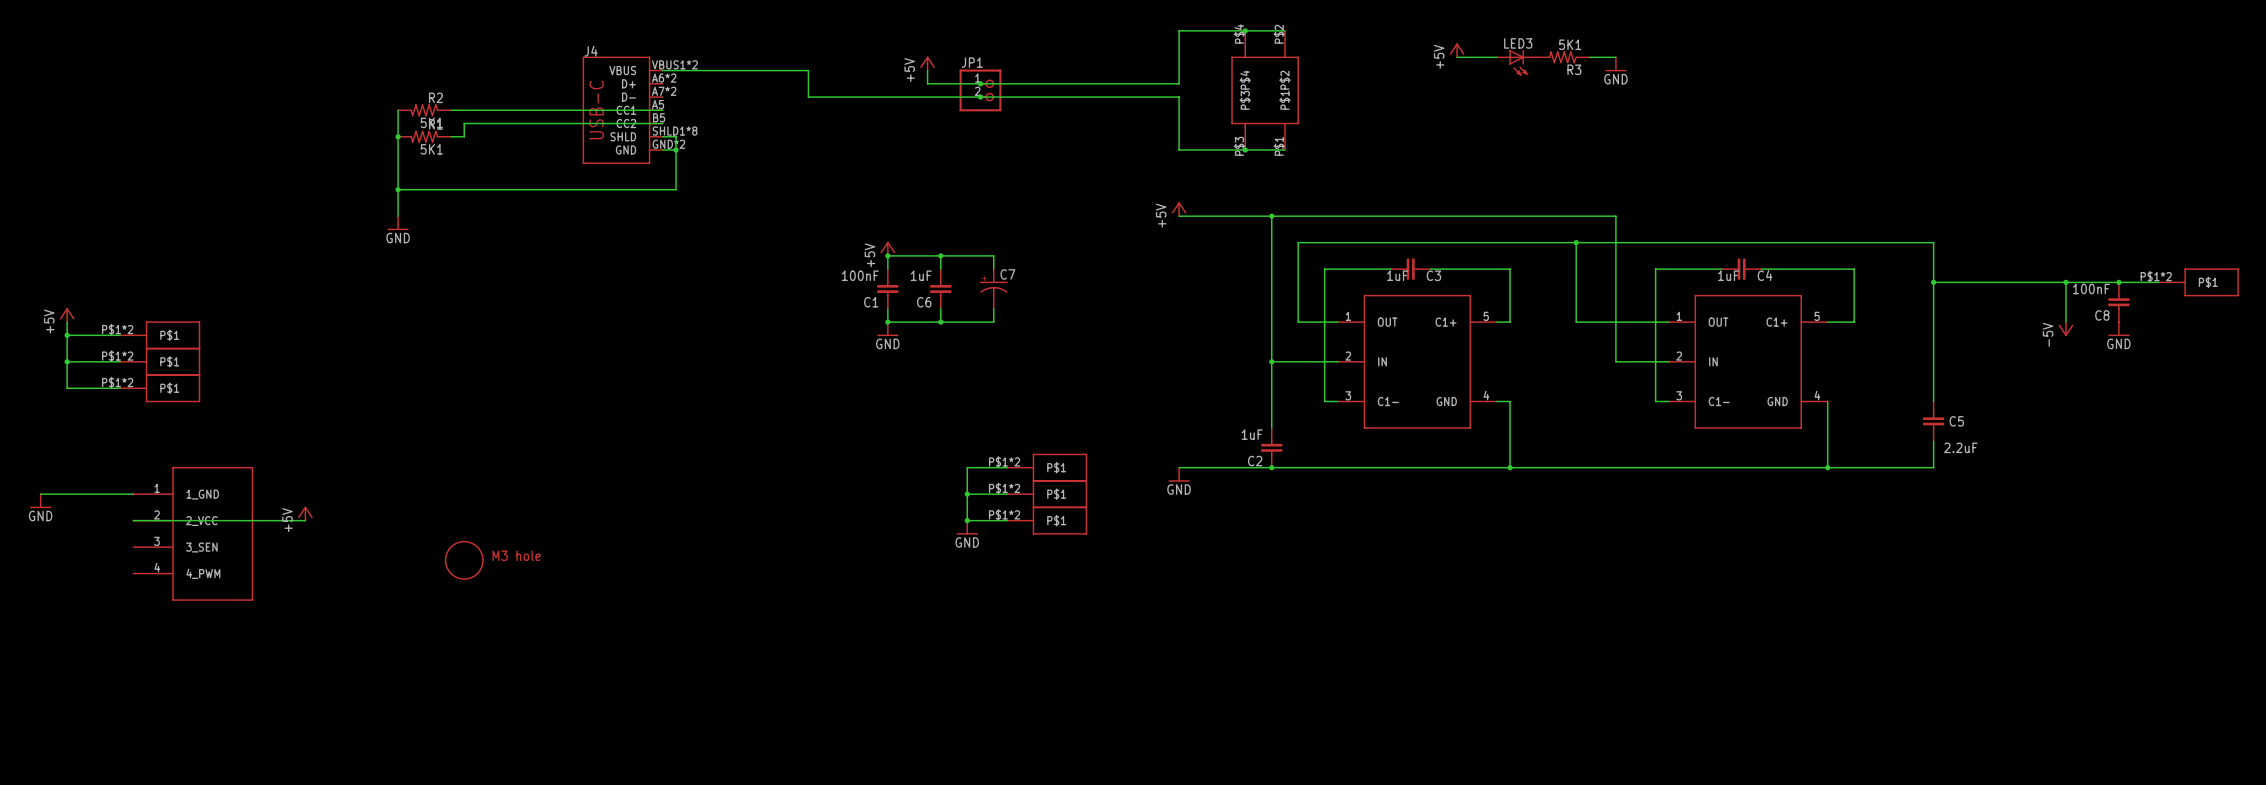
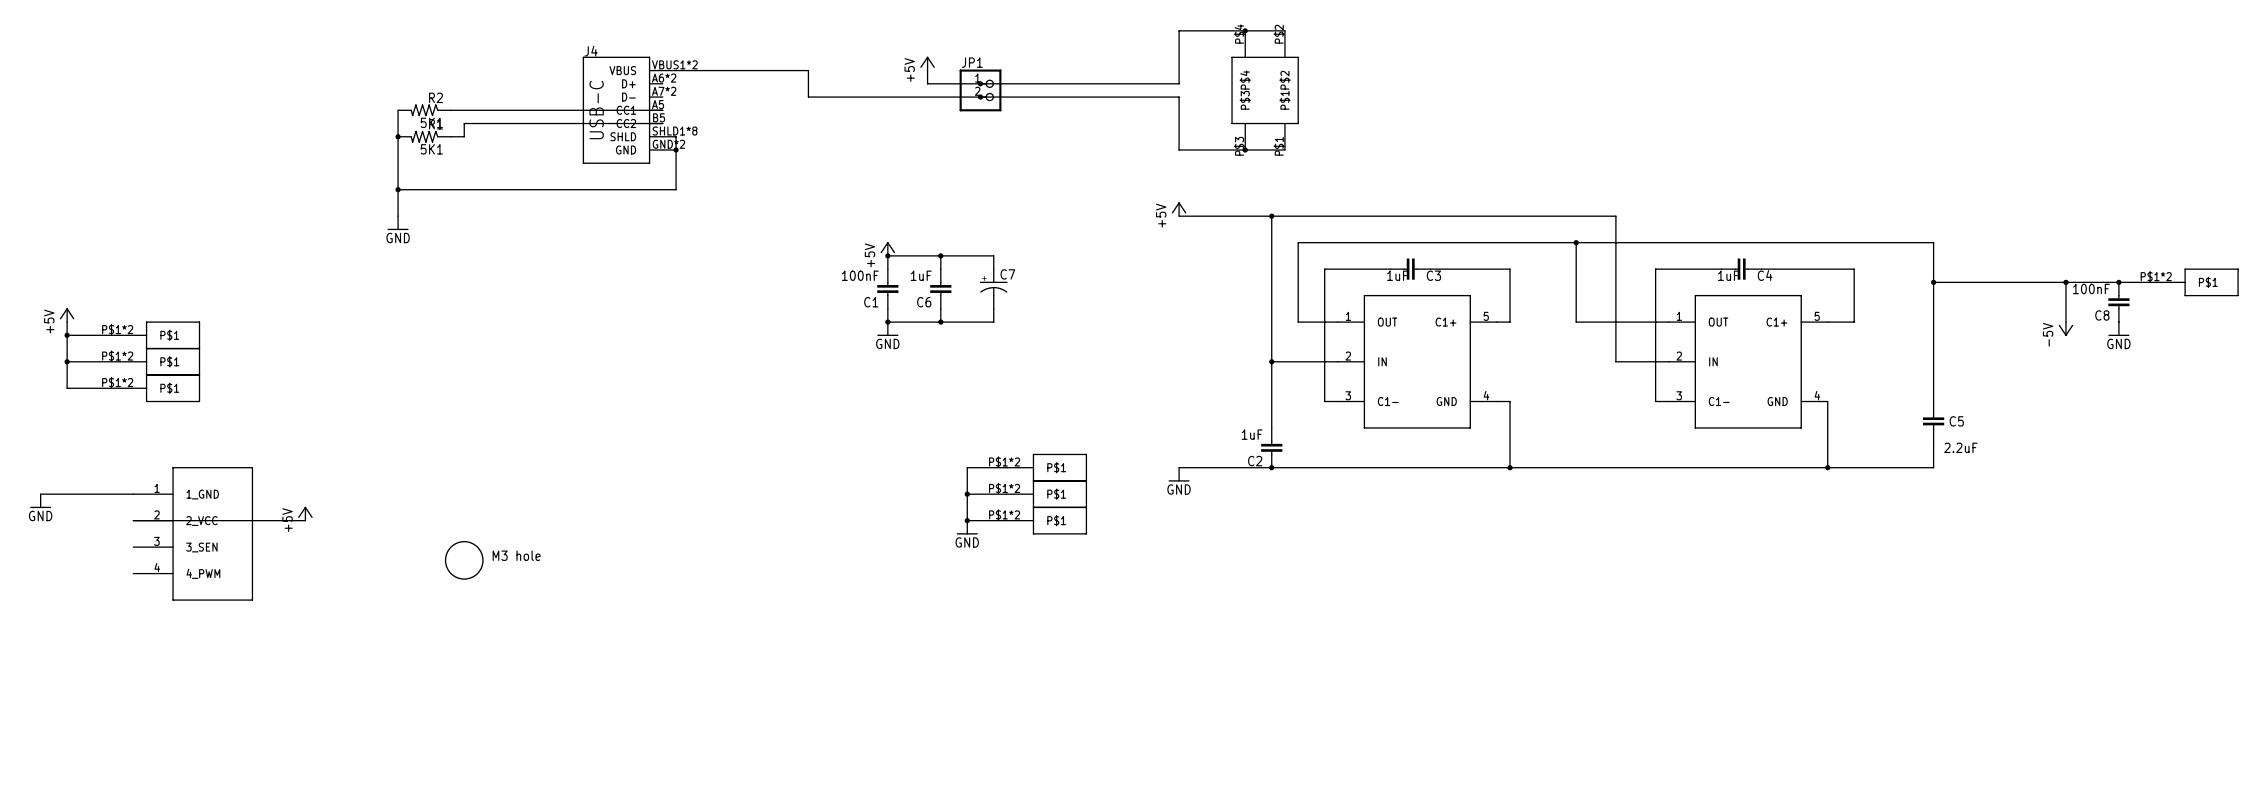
power symbol: +5V (1457, 50) -> none
wire: (1457, 57) (1496, 57) -> none
R3: 5K1 (1562, 57) -> none
wire: (1589, 57) (1615, 57) -> none
LED3: (1516, 62) -> none
power symbol: GND (1615, 64) -> none

